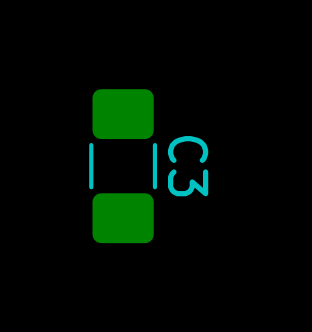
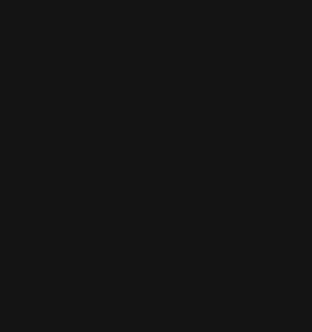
C3: (123, 166) -> none

